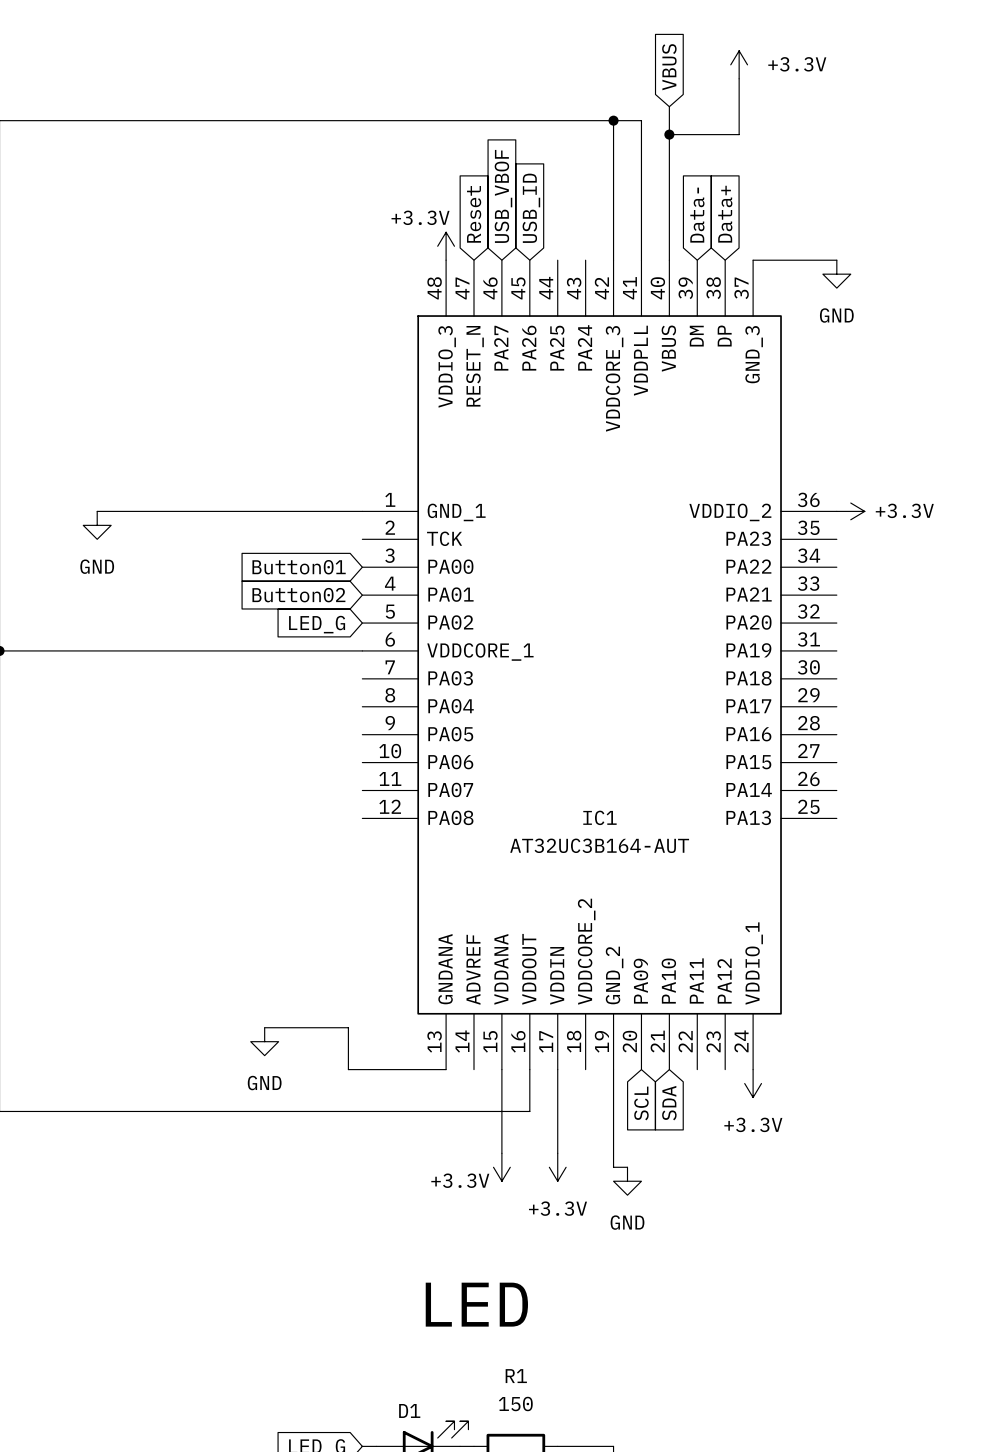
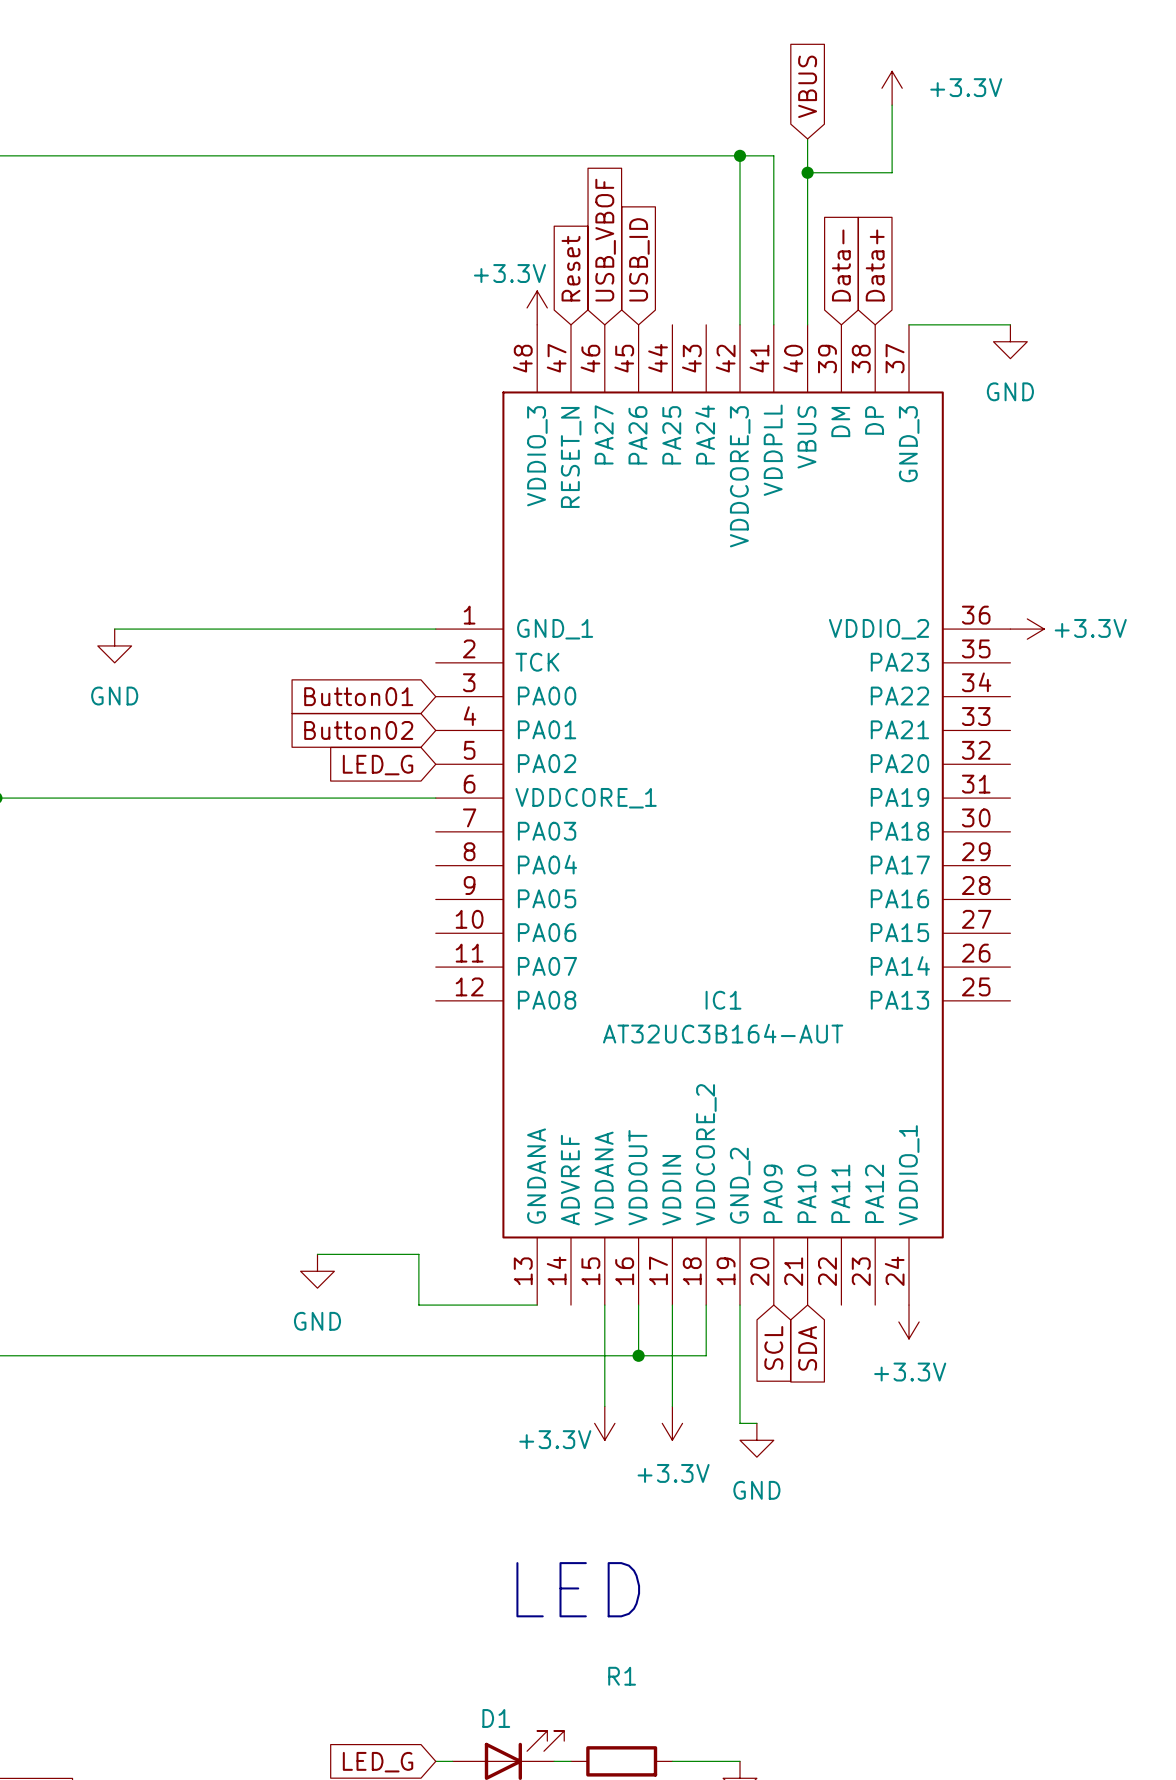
wire: none -> (706, 1305) (706, 1355) (638, 1355)
junction: none -> (638, 1355)
R1 value: 150 (515, 1404) -> none

